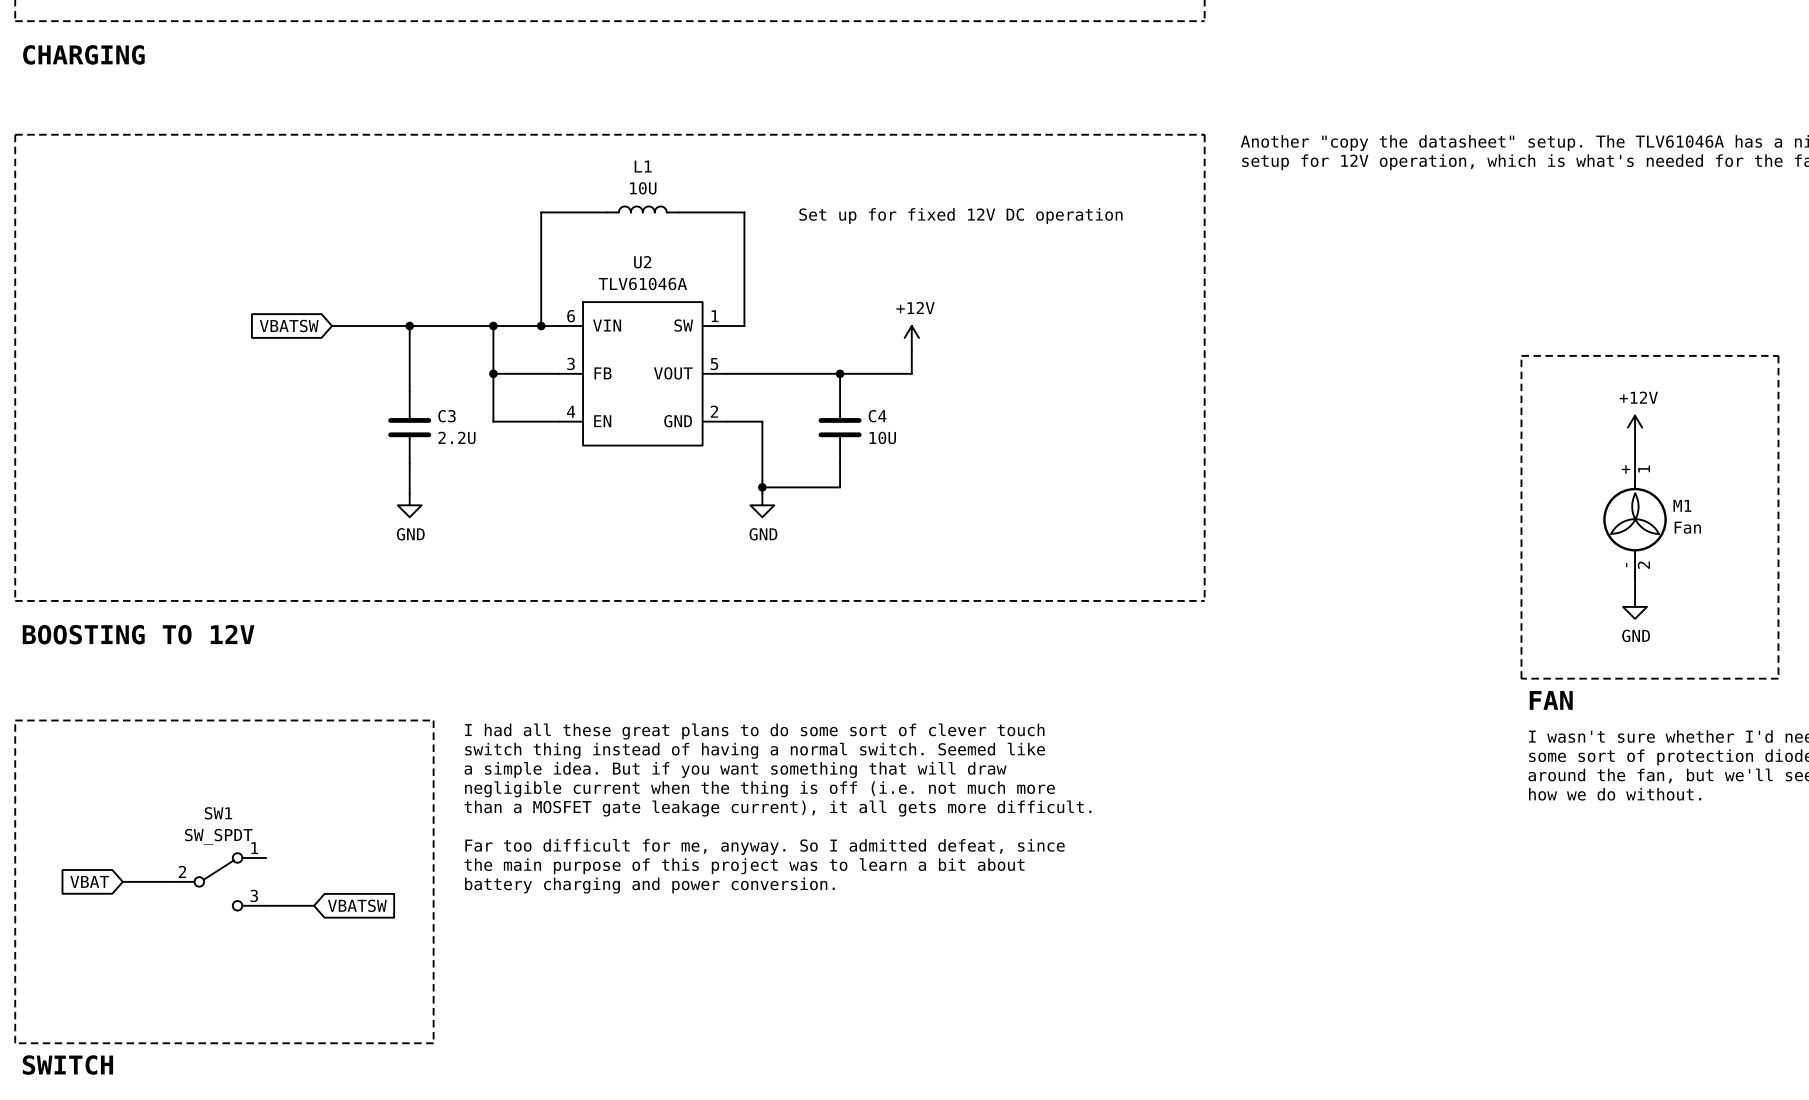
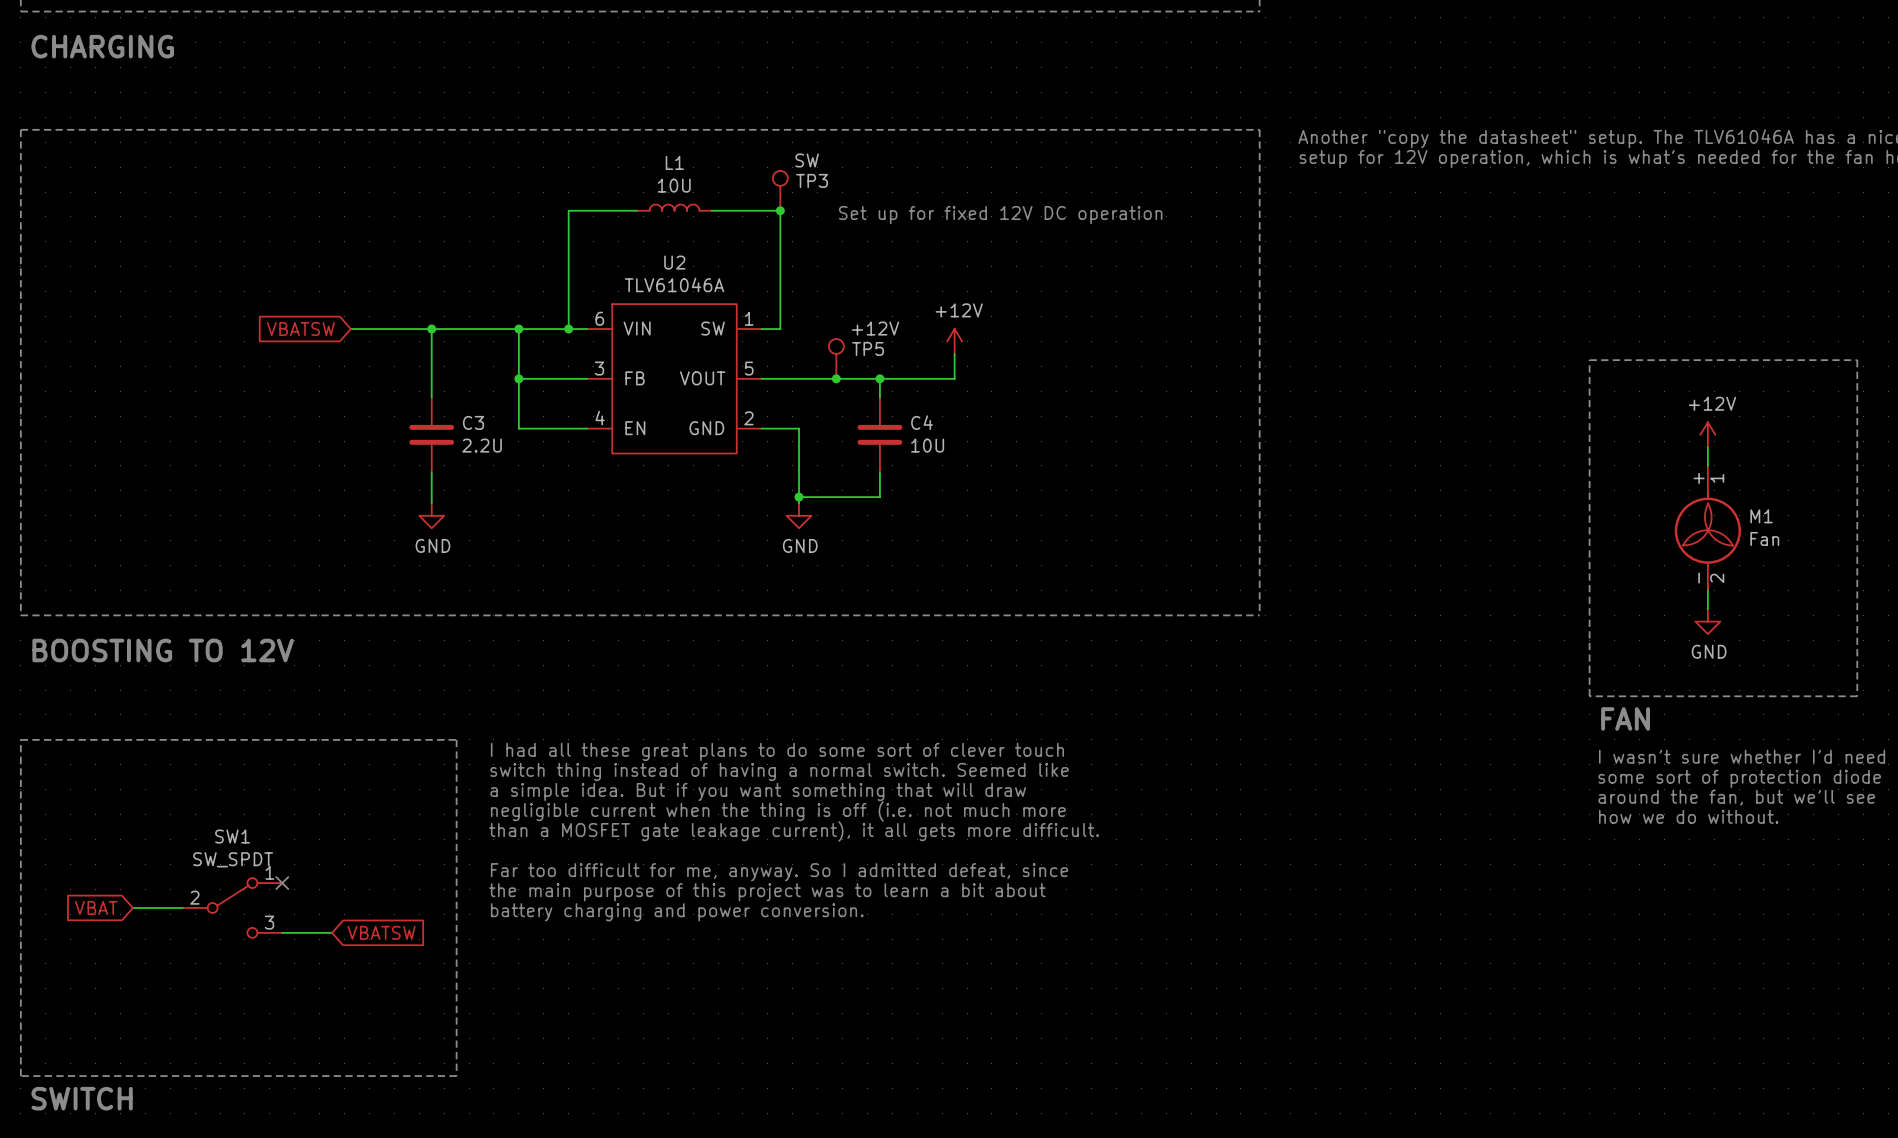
TP3: none -> SW (780, 190)
junction: none -> (780, 210)
TP5: none -> +12V (836, 358)
junction: none -> (836, 378)
no-connect mark: none -> (282, 883)

